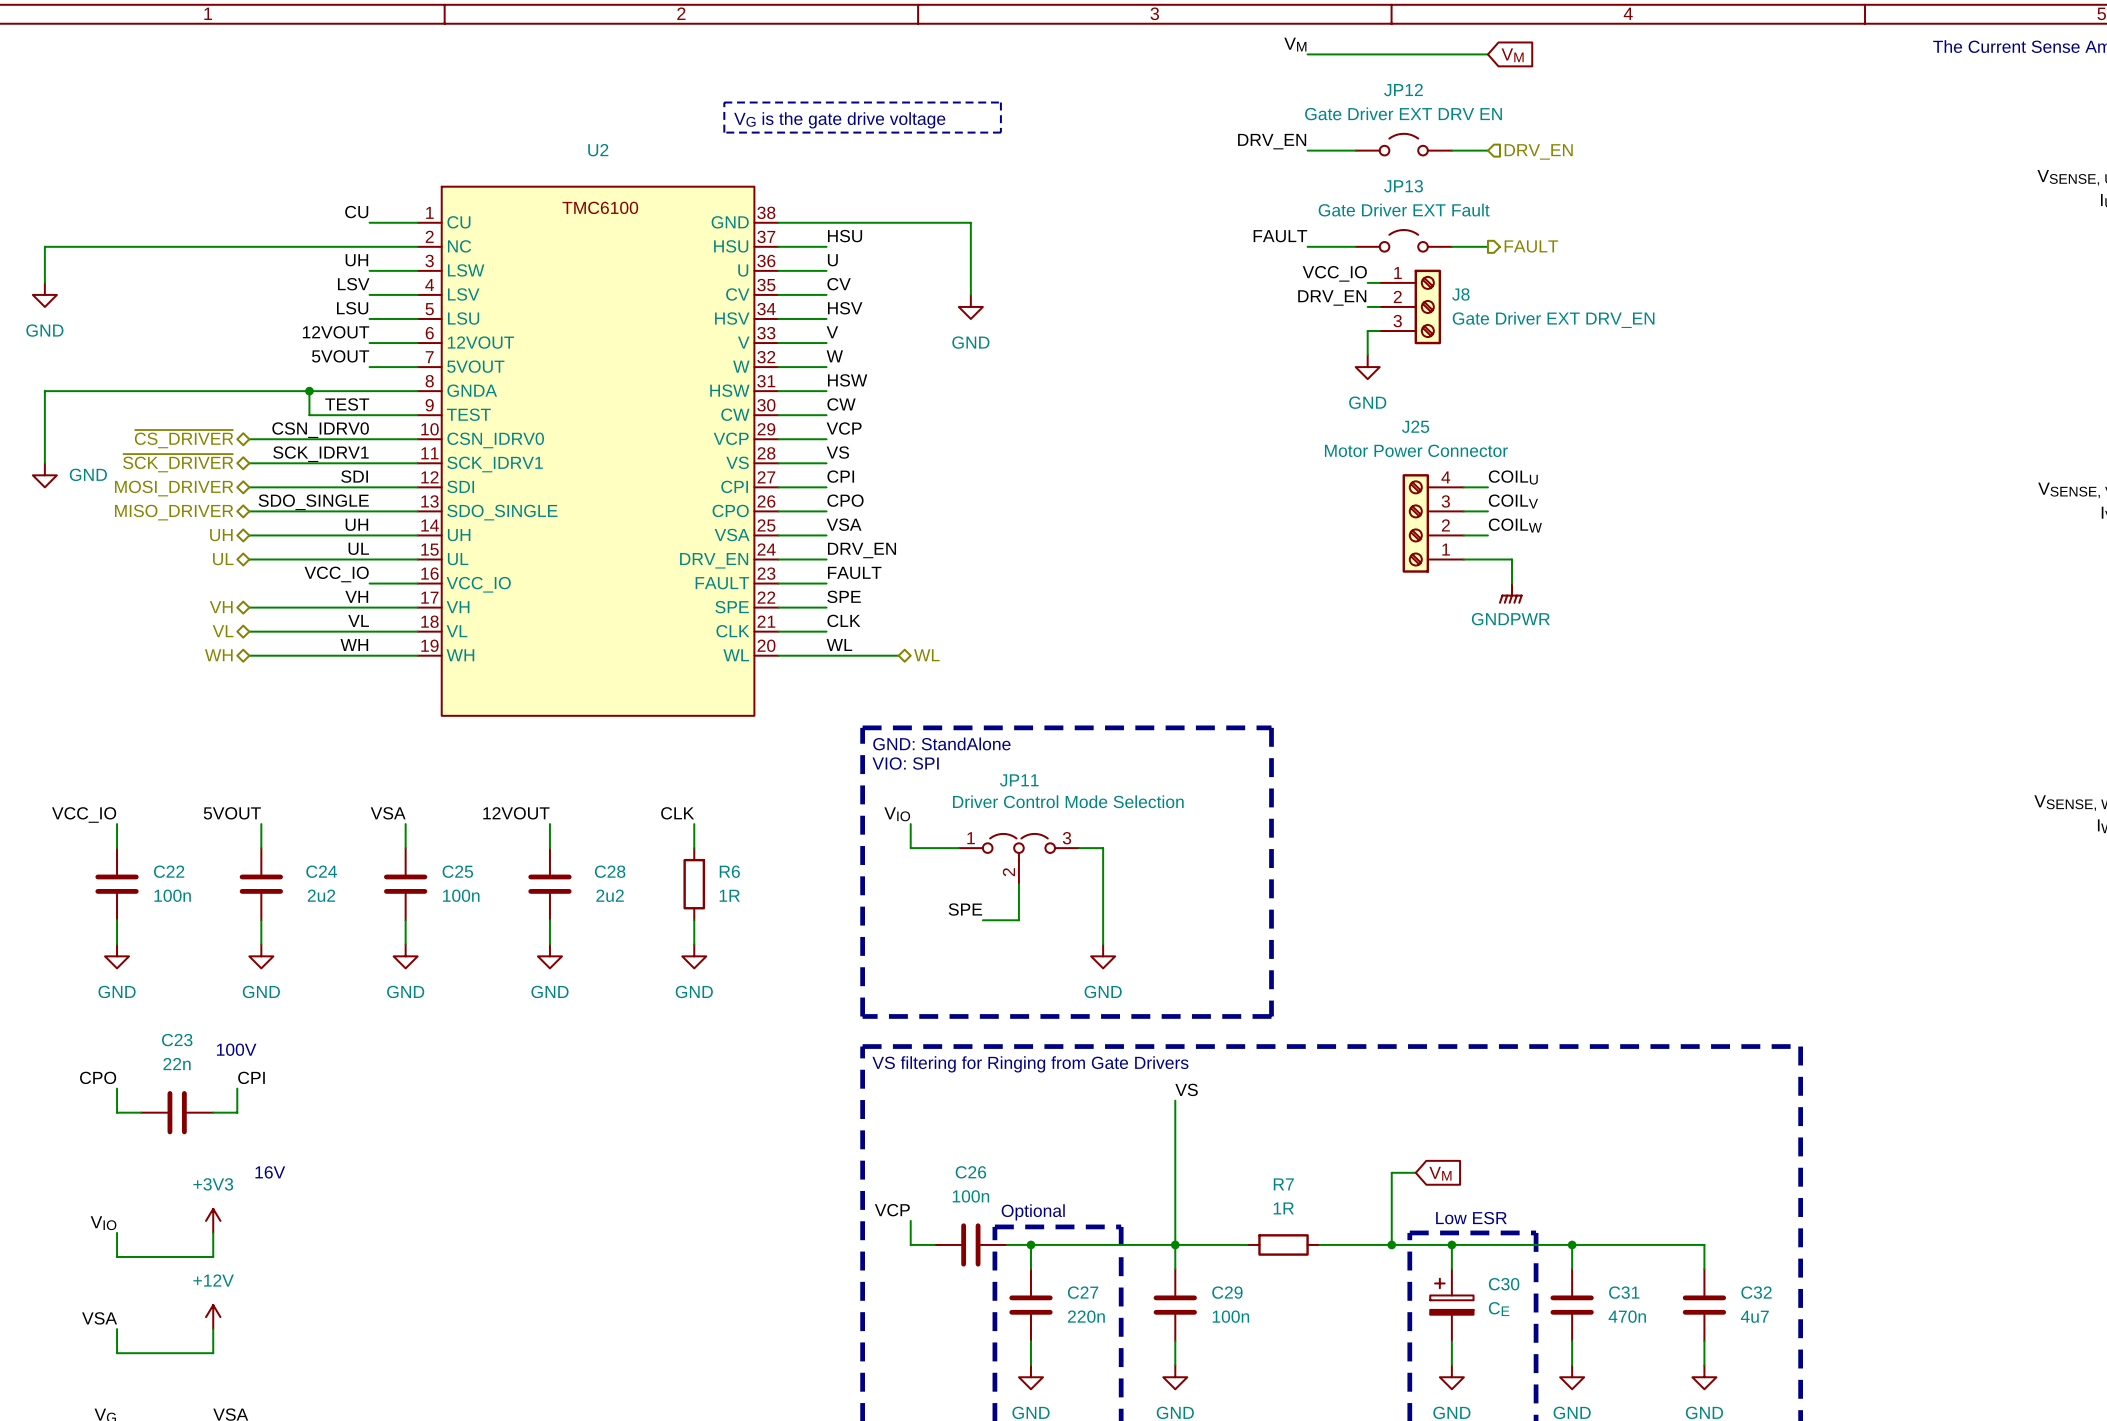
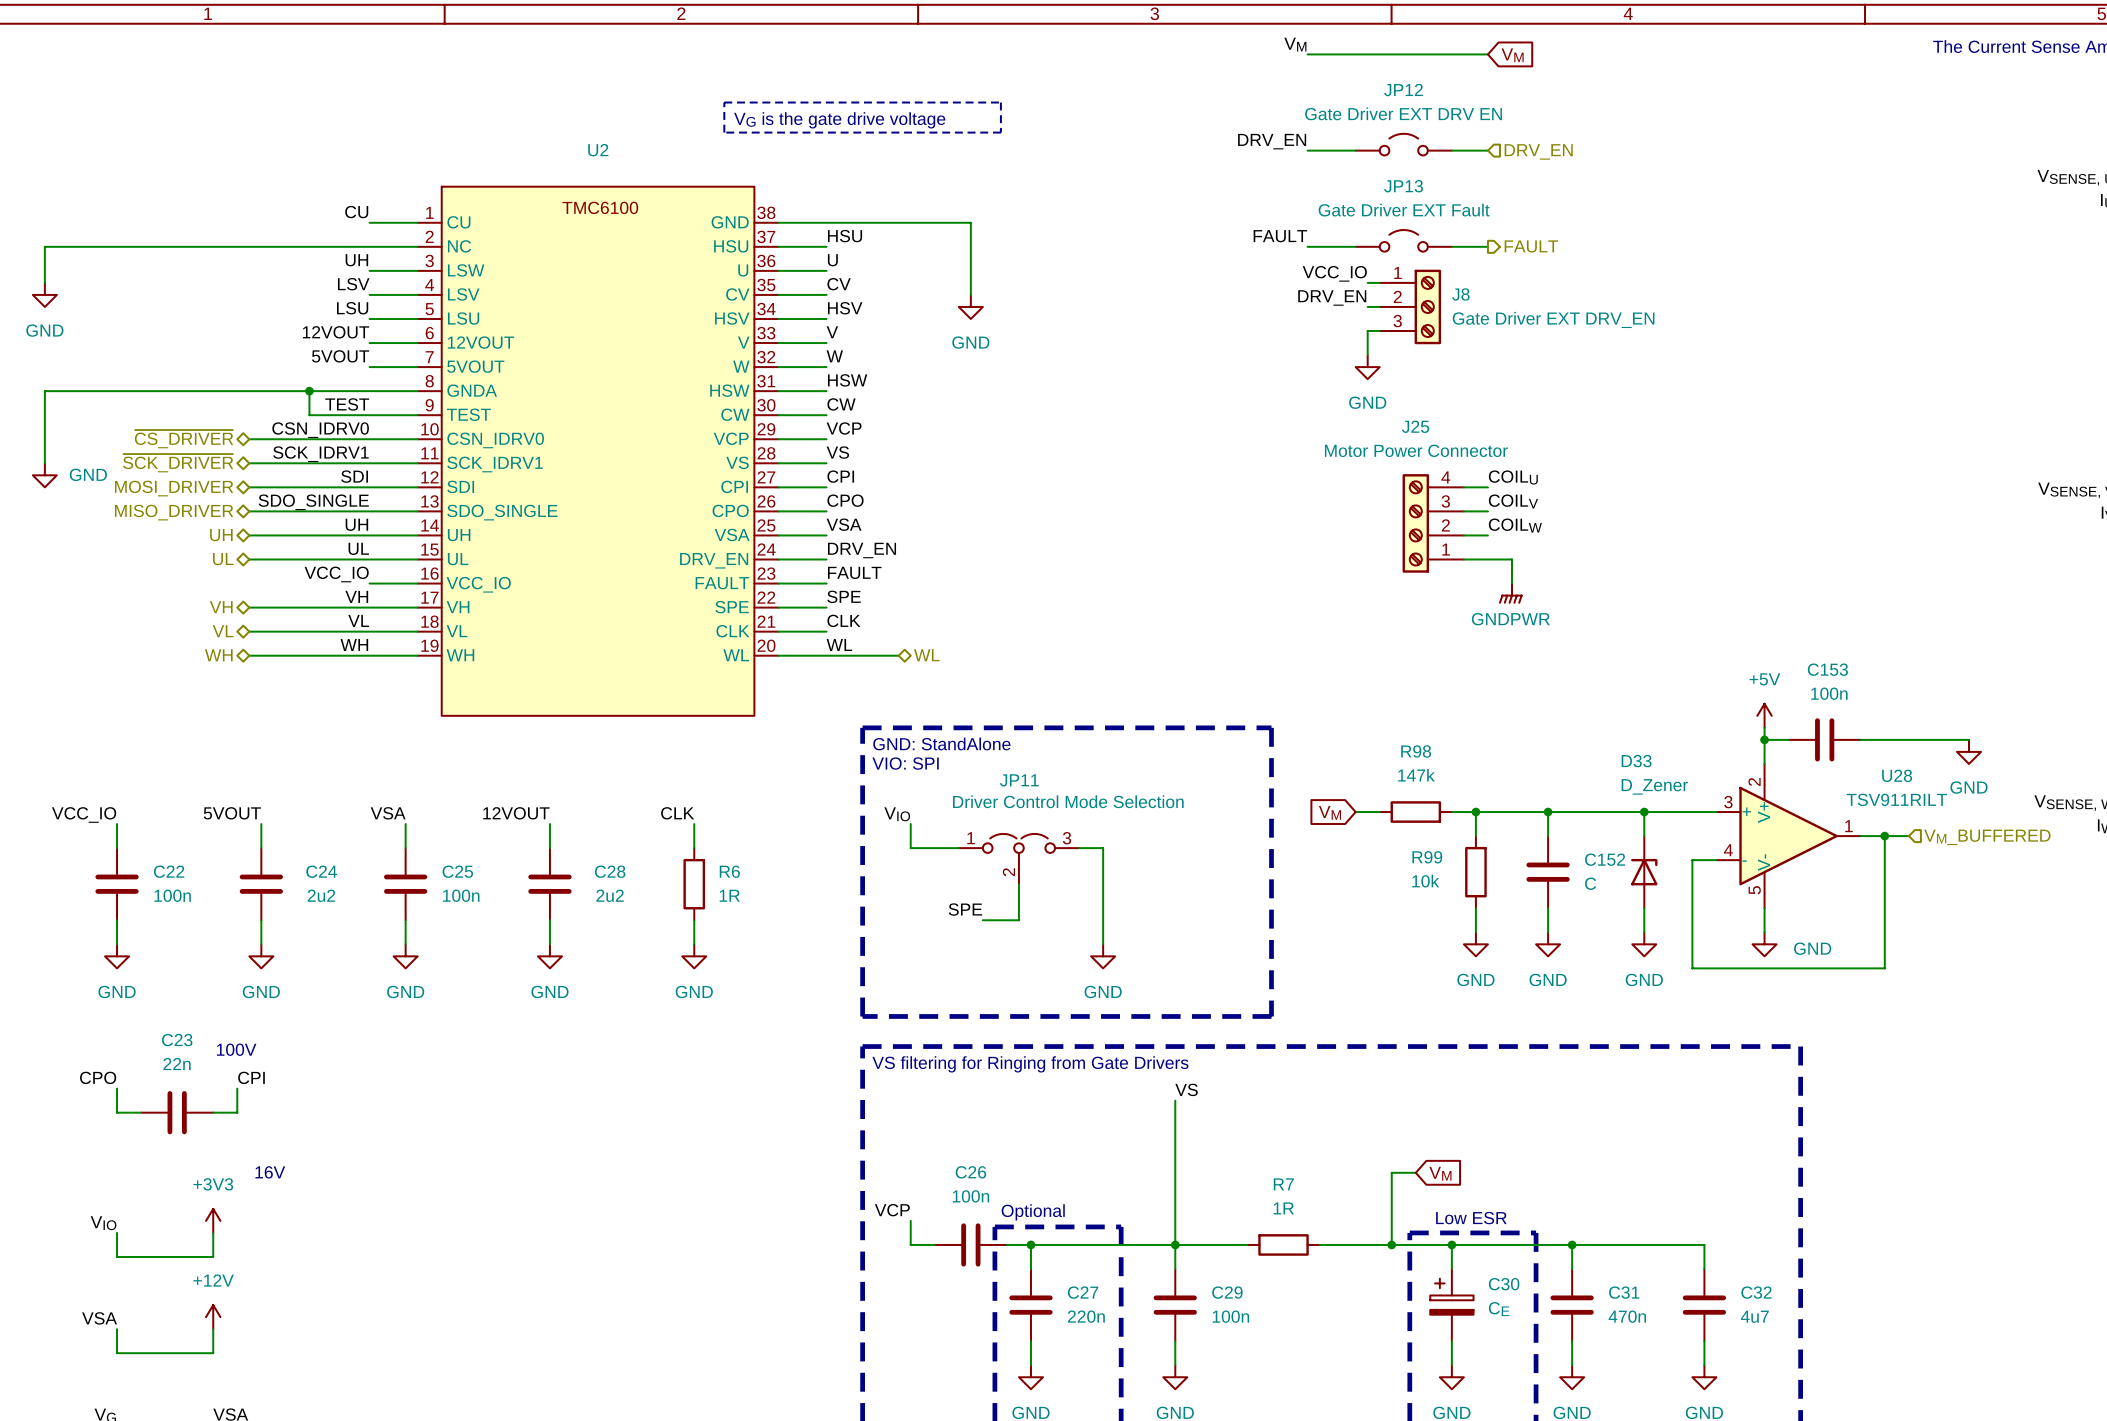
power symbol: none -> +5V (1764, 715)
wire: none -> (1764, 727) (1764, 763)
wire: none -> (1764, 739) (1788, 739)
junction: none -> (1764, 739)
C153: none -> 100n (1824, 739)
wire: none -> (1860, 739) (1968, 739)
power symbol: none -> GND (1968, 751)
global label: none -> VM (1329, 812)
wire: none -> (1355, 812) (1379, 812)
R98: none -> 147k (1415, 812)
wire: none -> (1451, 812) (1716, 812)
wire: none -> (1475, 812) (1475, 836)
junction: none -> (1475, 812)
wire: none -> (1548, 812) (1548, 836)
junction: none -> (1548, 812)
wire: none -> (1644, 812) (1644, 836)
junction: none -> (1644, 812)
U28: none -> TSV911RILT (1788, 836)
wire: none -> (1860, 836) (1908, 836)
wire: none -> (1884, 836) (1884, 968) (1692, 968) (1692, 860) (1716, 860)
junction: none -> (1884, 836)
hierarchical label: none -> VM_BUFFERED (1987, 837)
R99: none -> 10k (1475, 872)
C152: none -> C (1548, 872)
D33: none -> D_Zener (1644, 872)
wire: none -> (1475, 908) (1475, 932)
wire: none -> (1548, 908) (1548, 932)
wire: none -> (1644, 908) (1644, 932)
wire: none -> (1764, 908) (1764, 932)
power symbol: none -> GND (1475, 944)
power symbol: none -> GND (1548, 944)
power symbol: none -> GND (1644, 944)
power symbol: none -> GND (1764, 944)

